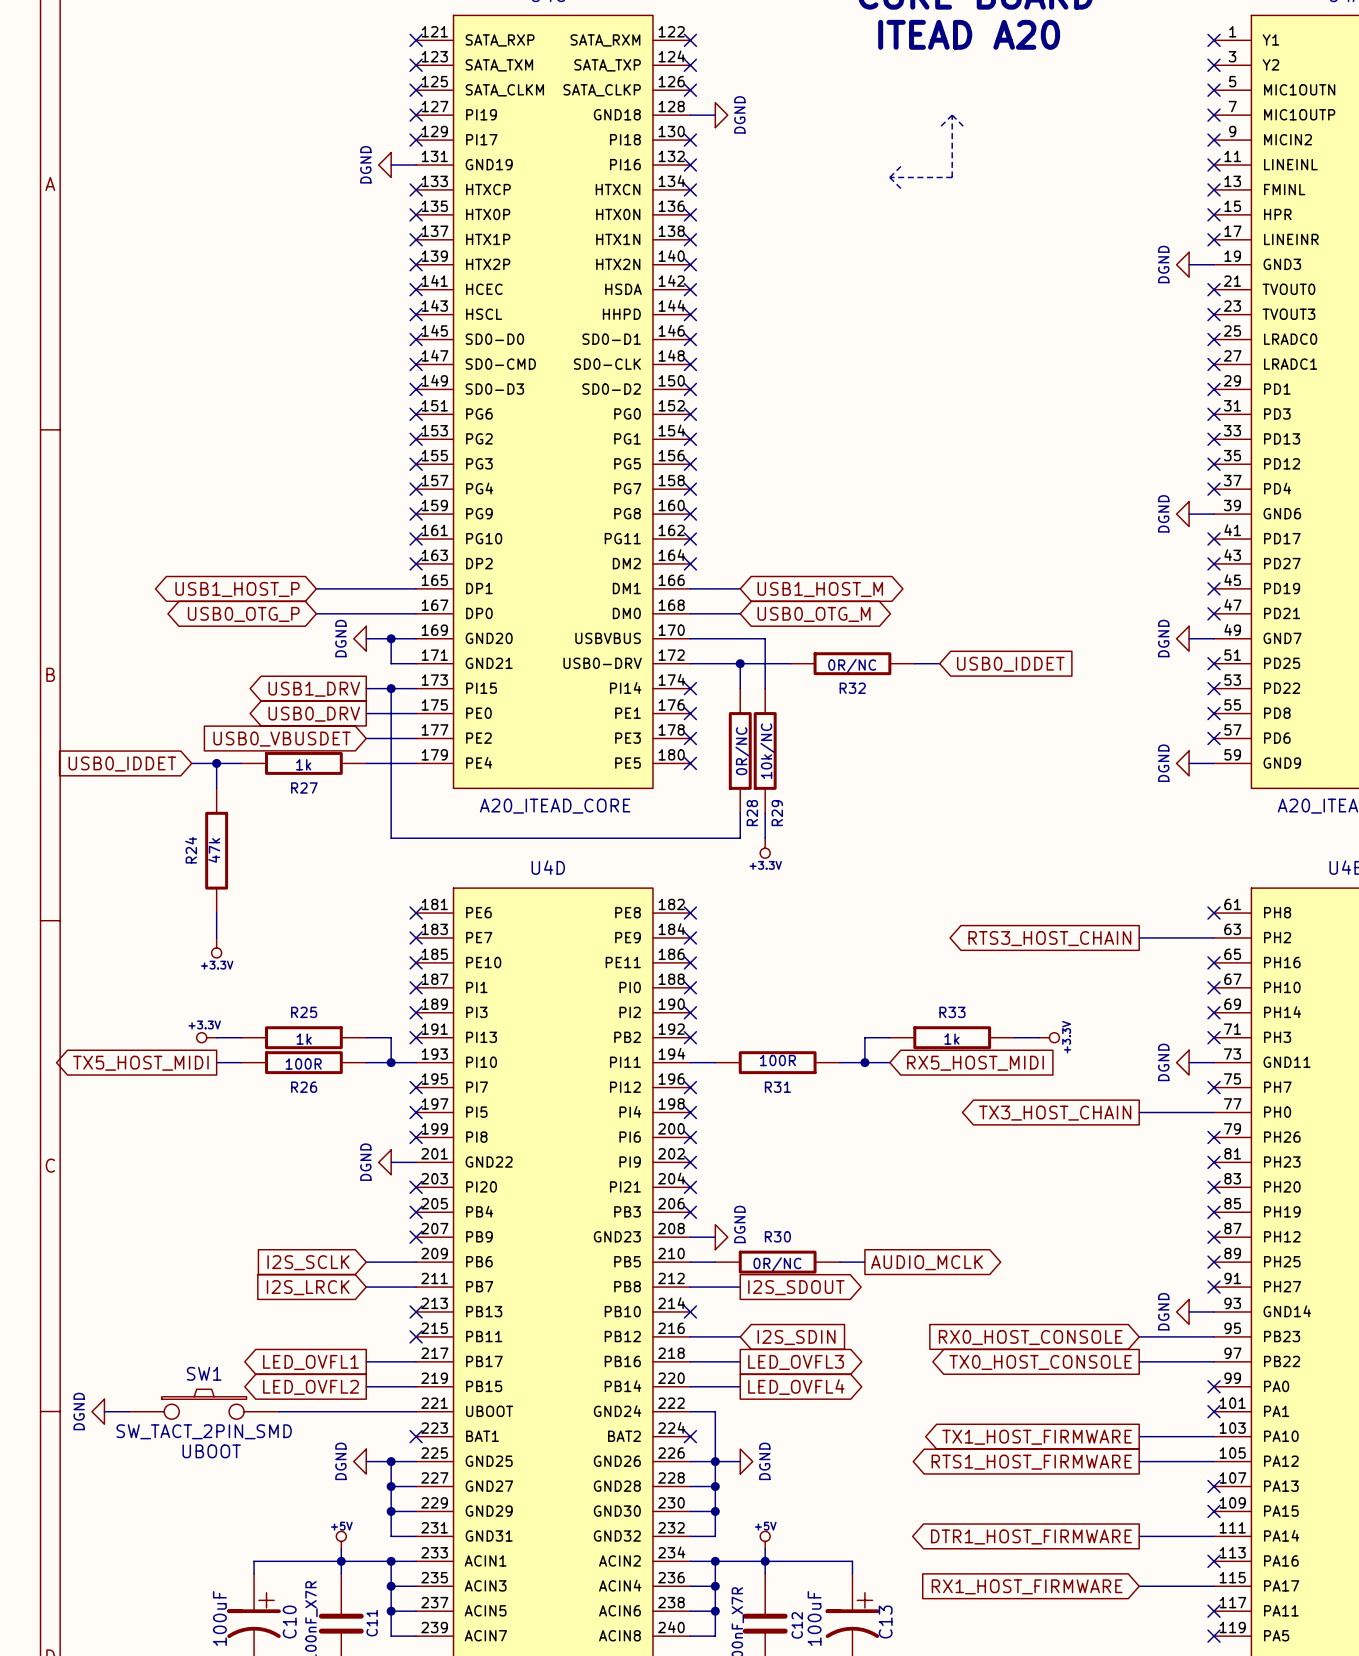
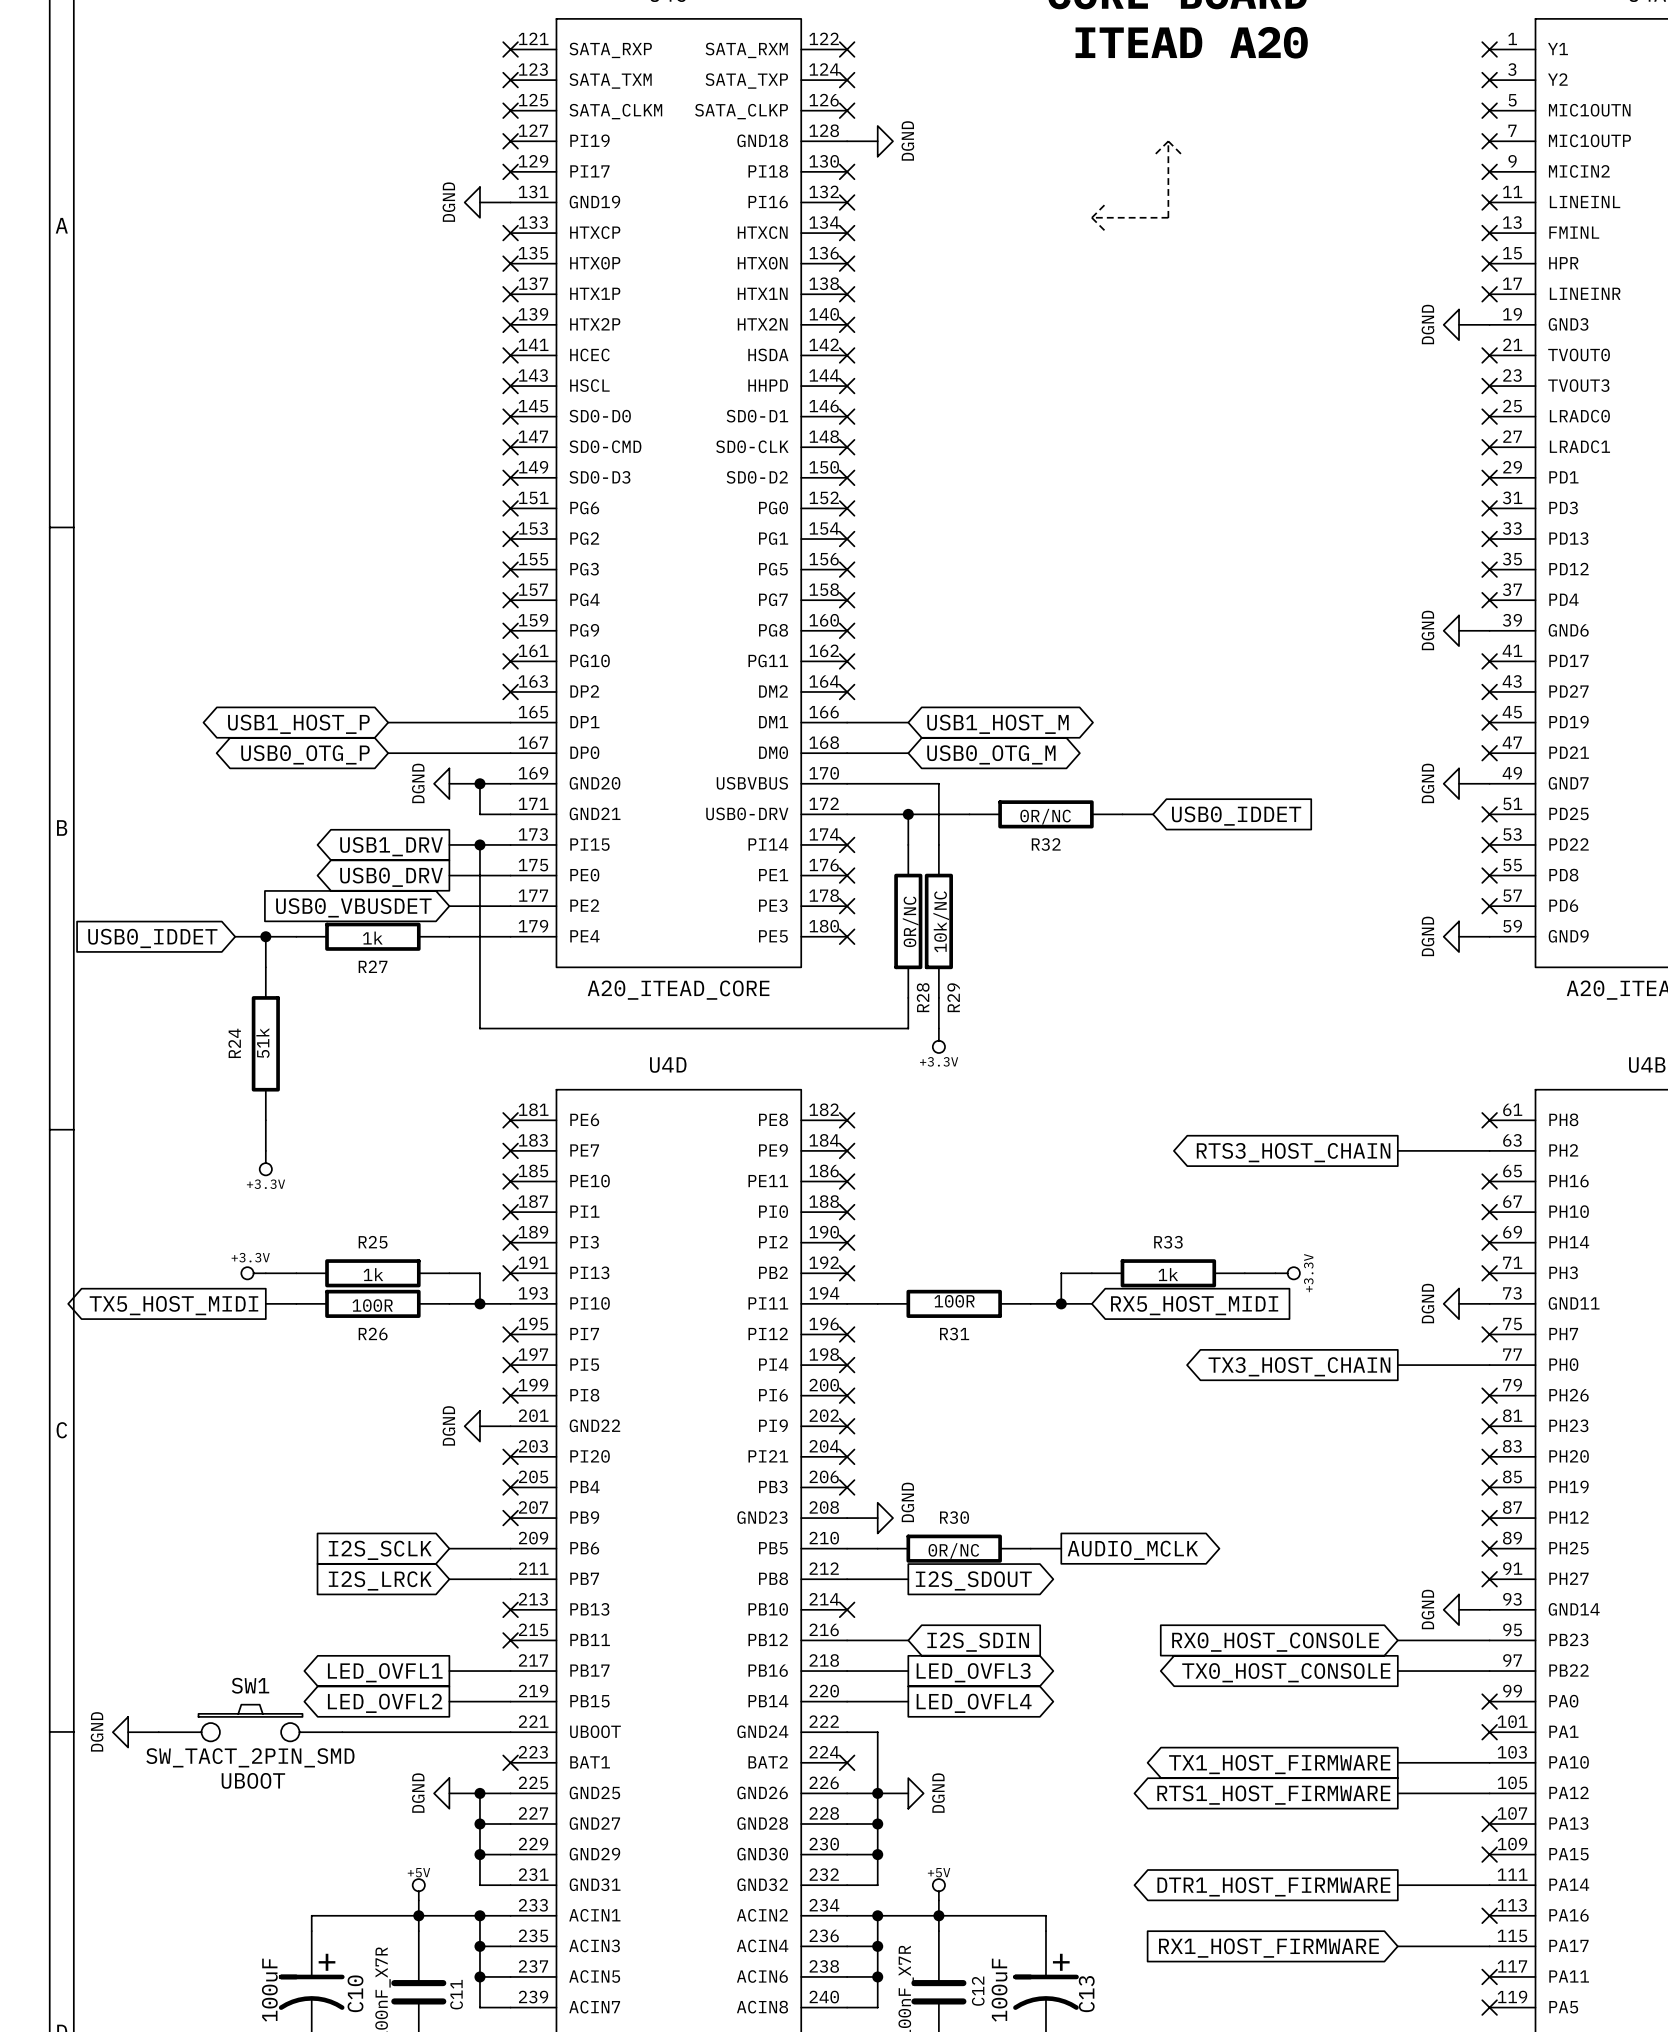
R24 value: 47k (214, 850) -> 51k (262, 1043)

